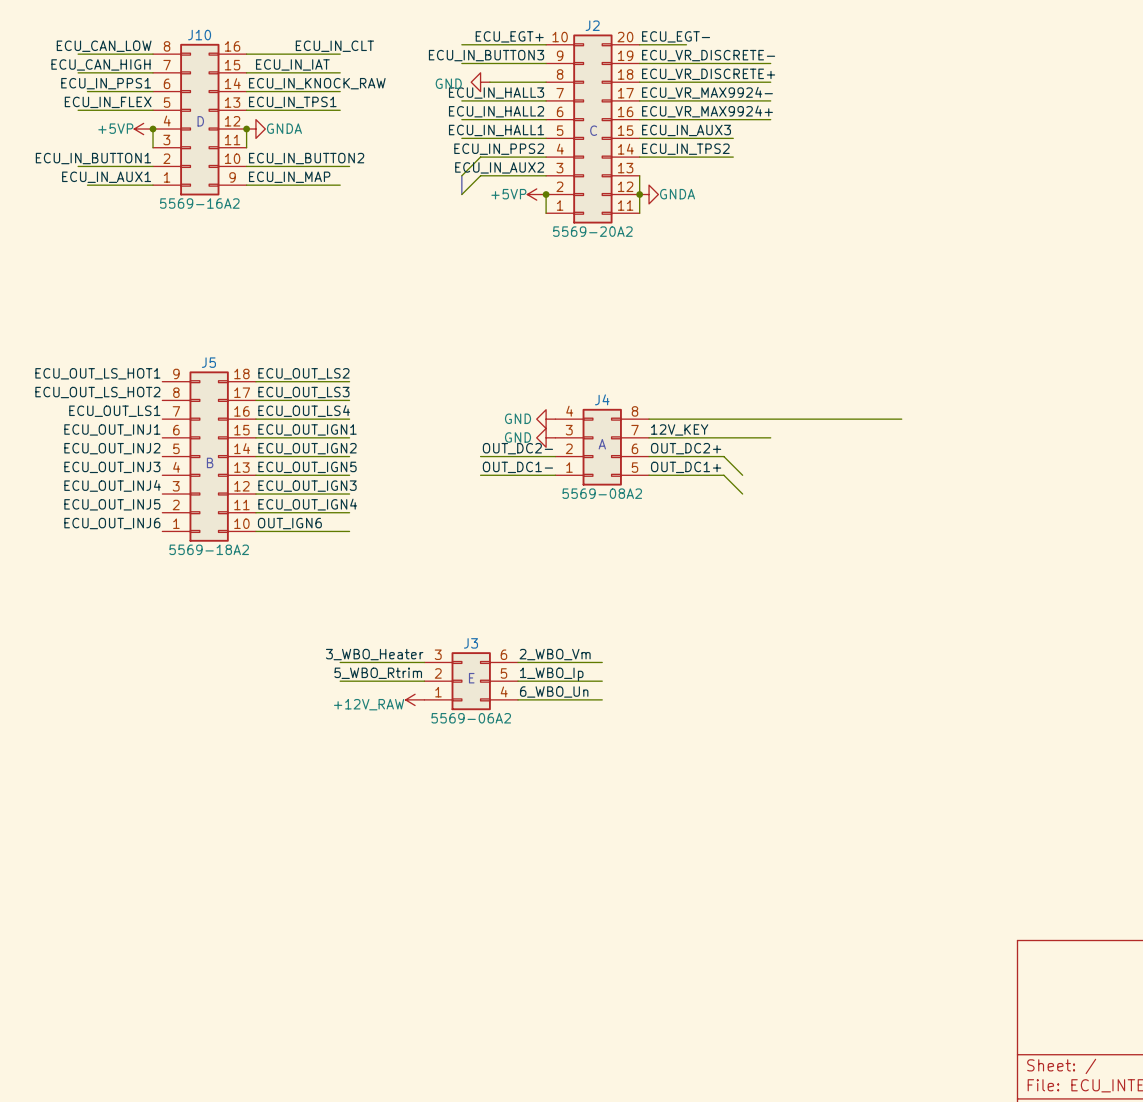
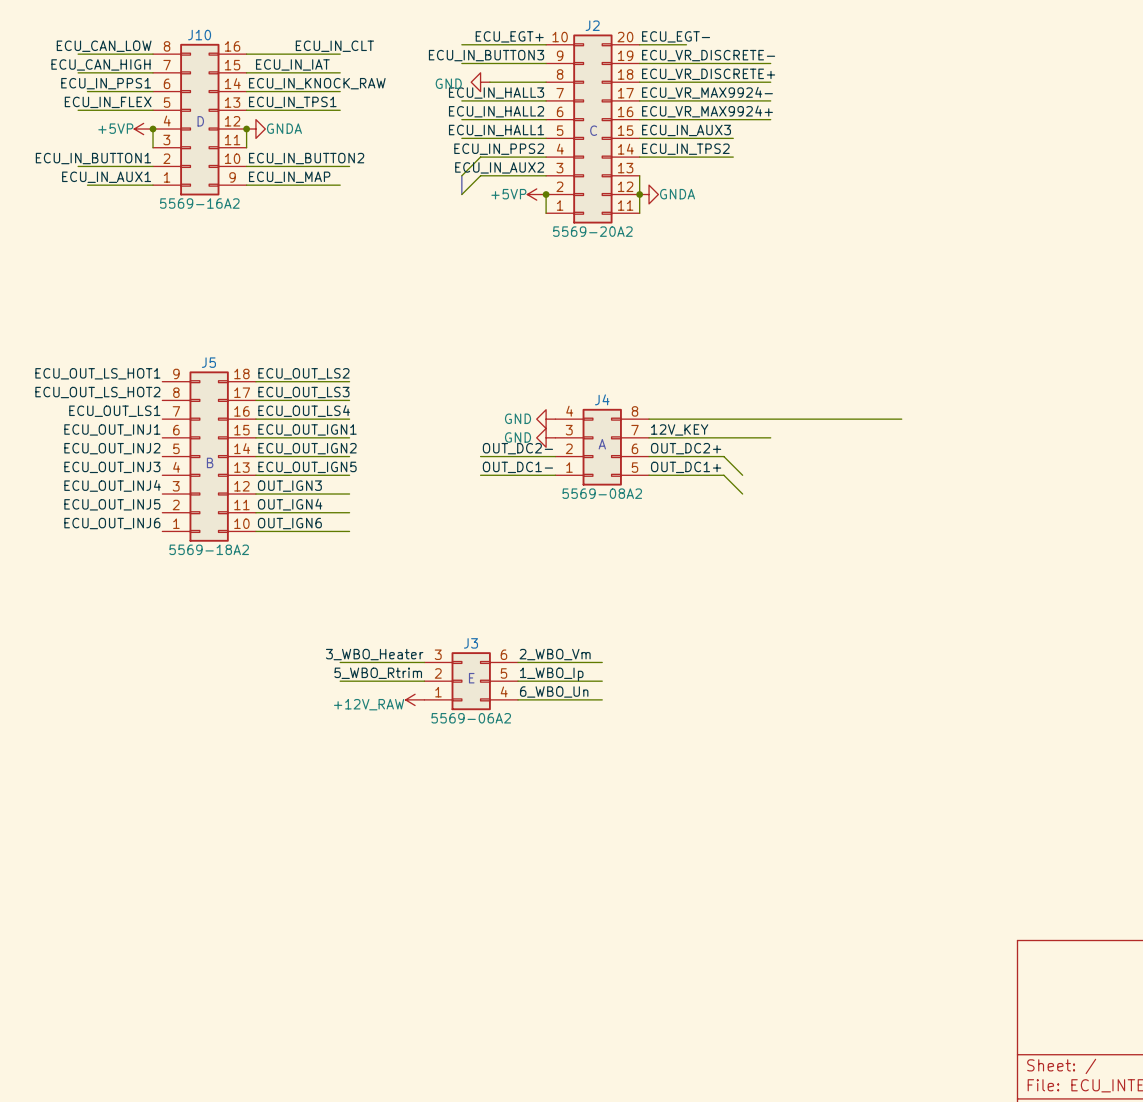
label: ECU_OUT_IGN3 (307, 486) -> OUT_IGN3 (289, 486)
label: ECU_OUT_IGN4 (307, 504) -> OUT_IGN4 (290, 504)

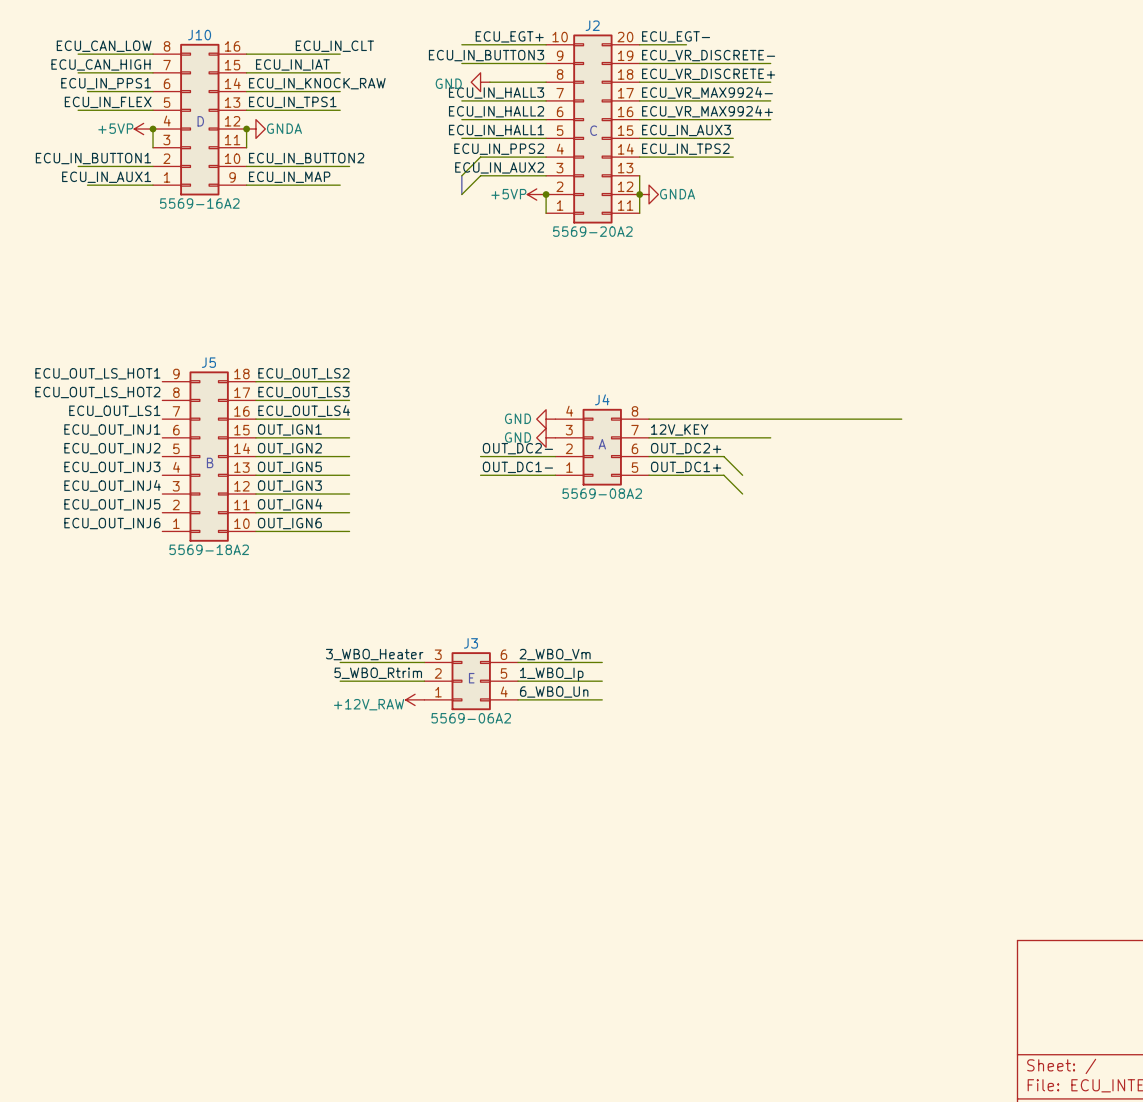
label: ECU_OUT_IGN1 (307, 429) -> OUT_IGN1 (289, 429)
label: ECU_OUT_IGN2 (307, 448) -> OUT_IGN2 (289, 448)
label: ECU_OUT_IGN5 (307, 467) -> OUT_IGN5 (289, 467)

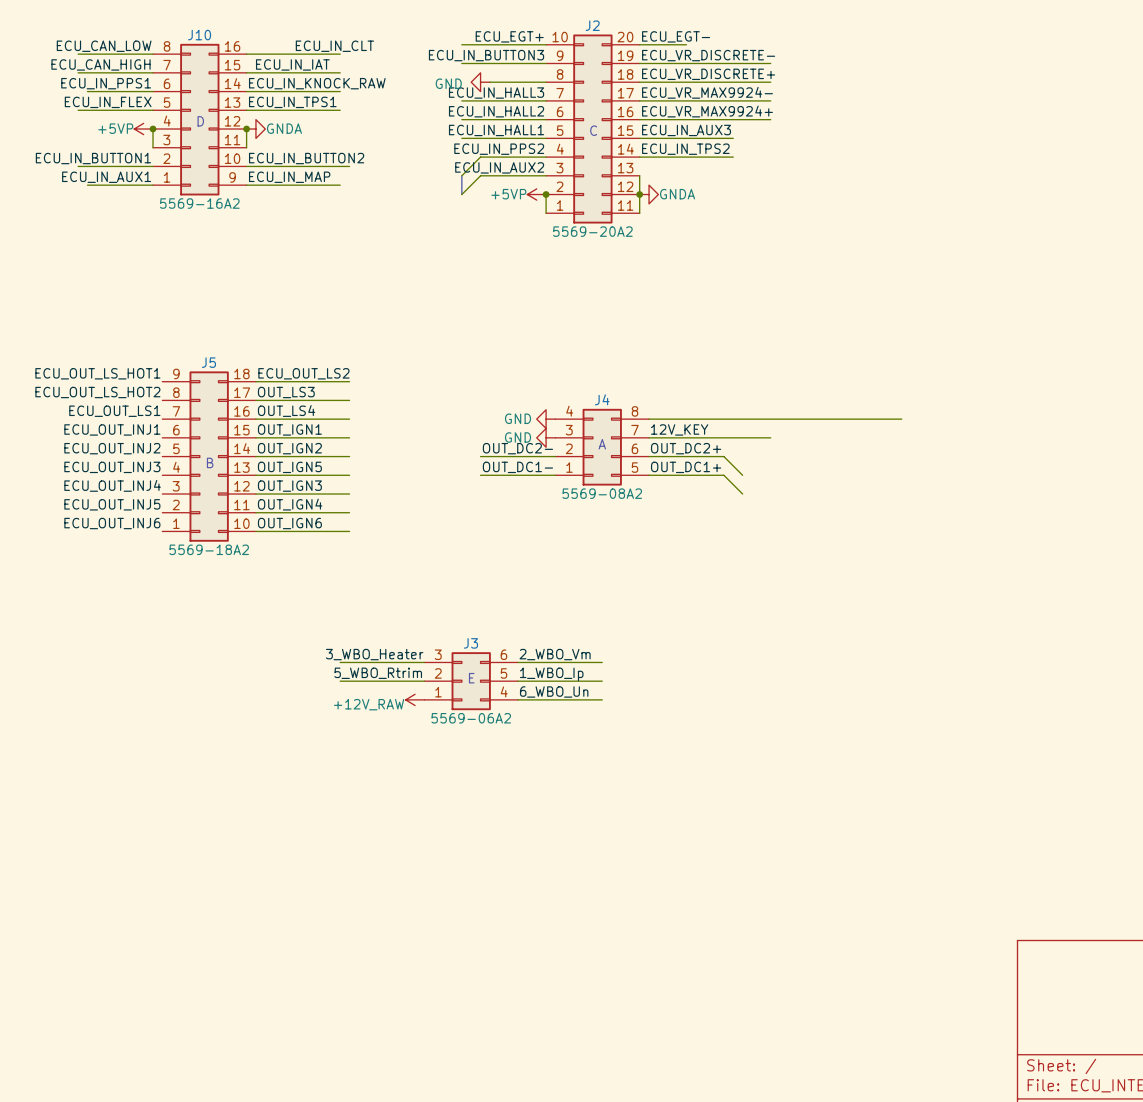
label: ECU_OUT_LS3 (303, 392) -> OUT_LS3 (286, 392)
label: ECU_OUT_LS4 (304, 411) -> OUT_LS4 (286, 411)

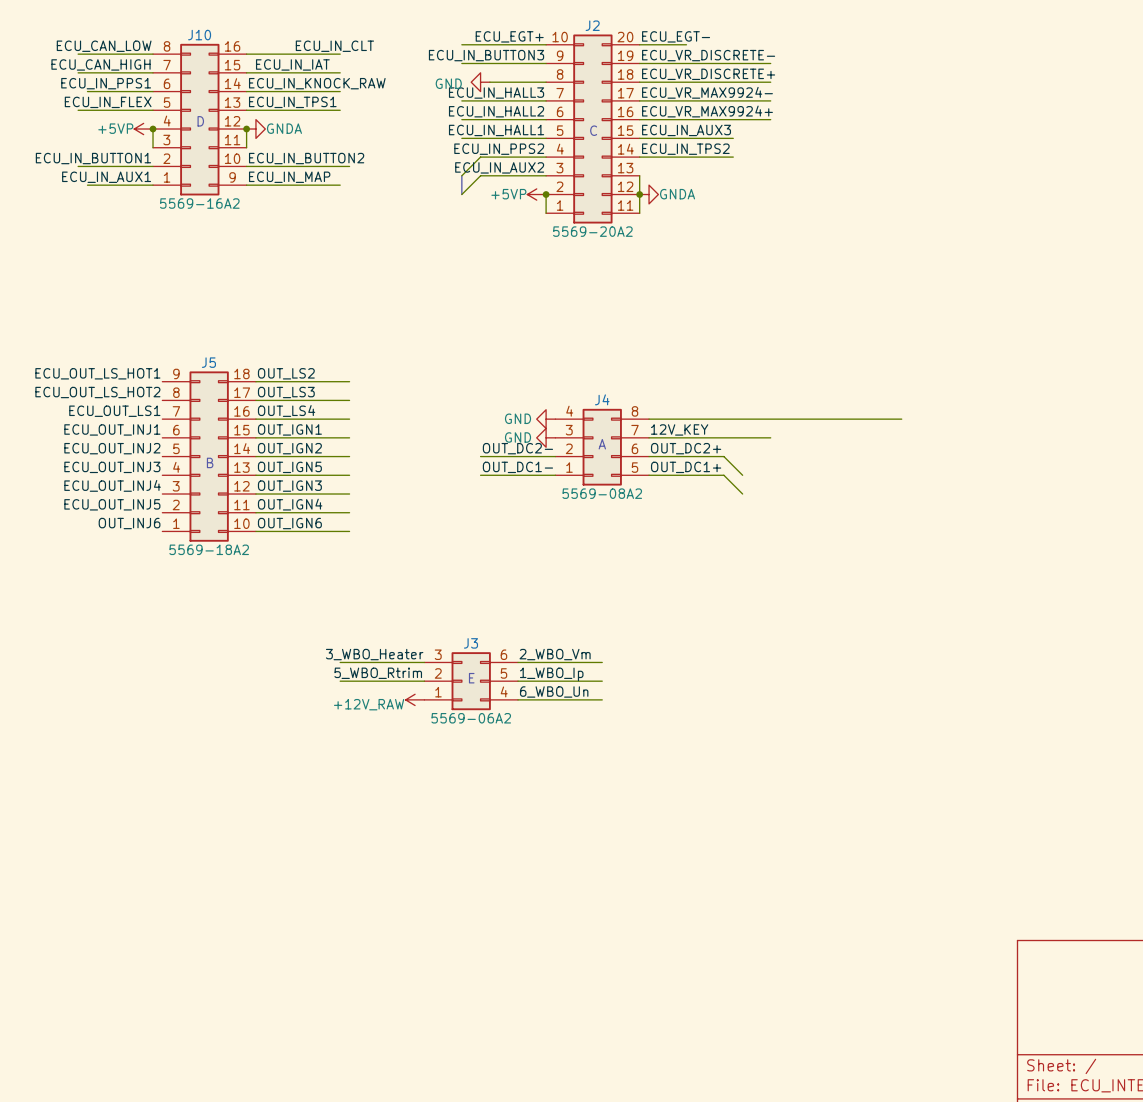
label: ECU_OUT_LS2 (303, 373) -> OUT_LS2 (286, 373)
label: ECU_OUT_INJ6 (112, 523) -> OUT_INJ6 (129, 523)

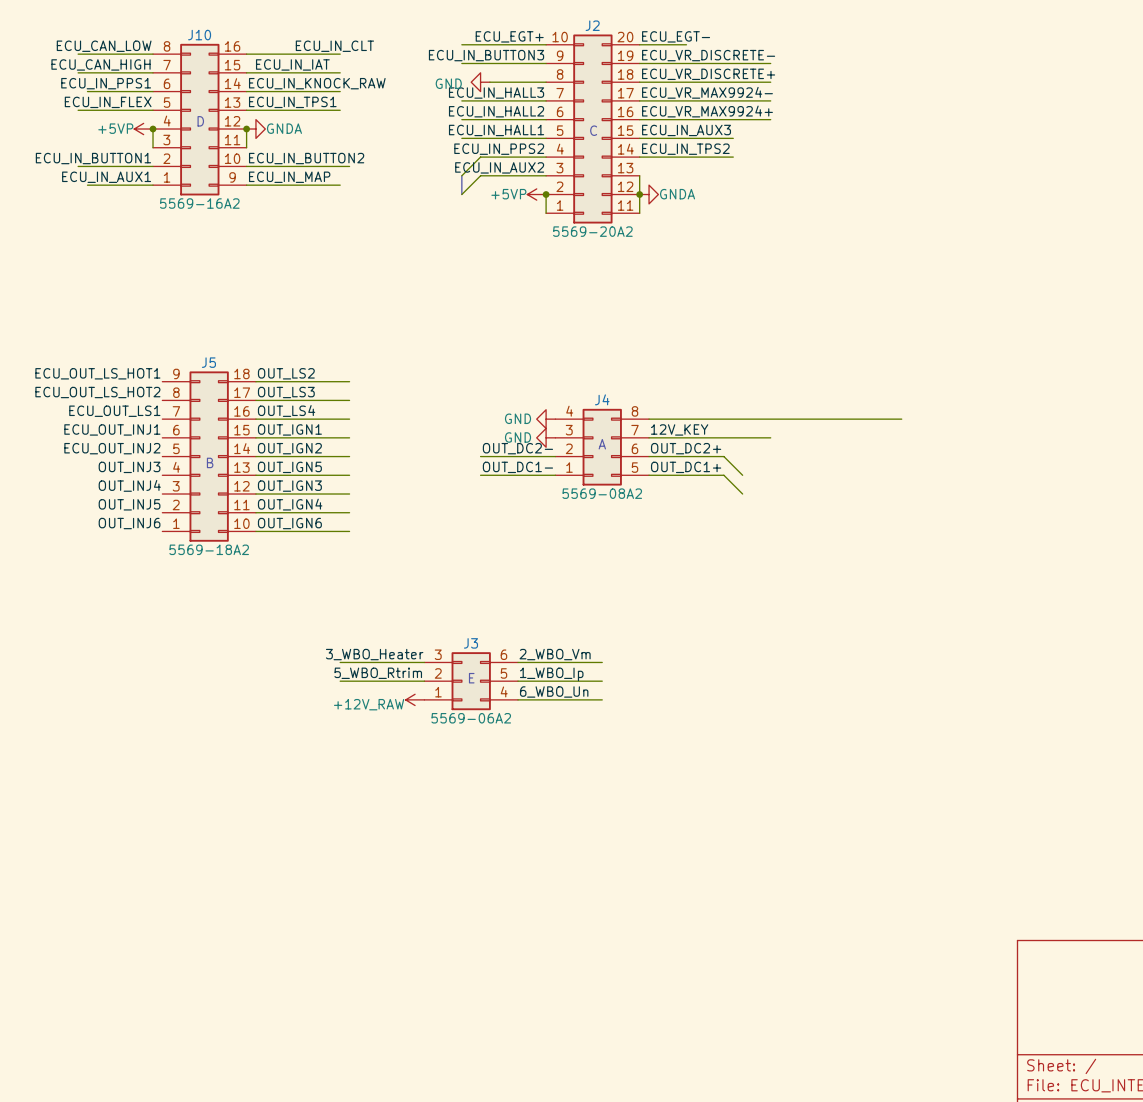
label: ECU_OUT_INJ3 (112, 467) -> OUT_INJ3 (129, 467)
label: ECU_OUT_INJ4 (112, 485) -> OUT_INJ4 (129, 485)
label: ECU_OUT_INJ5 (112, 504) -> OUT_INJ5 (129, 504)

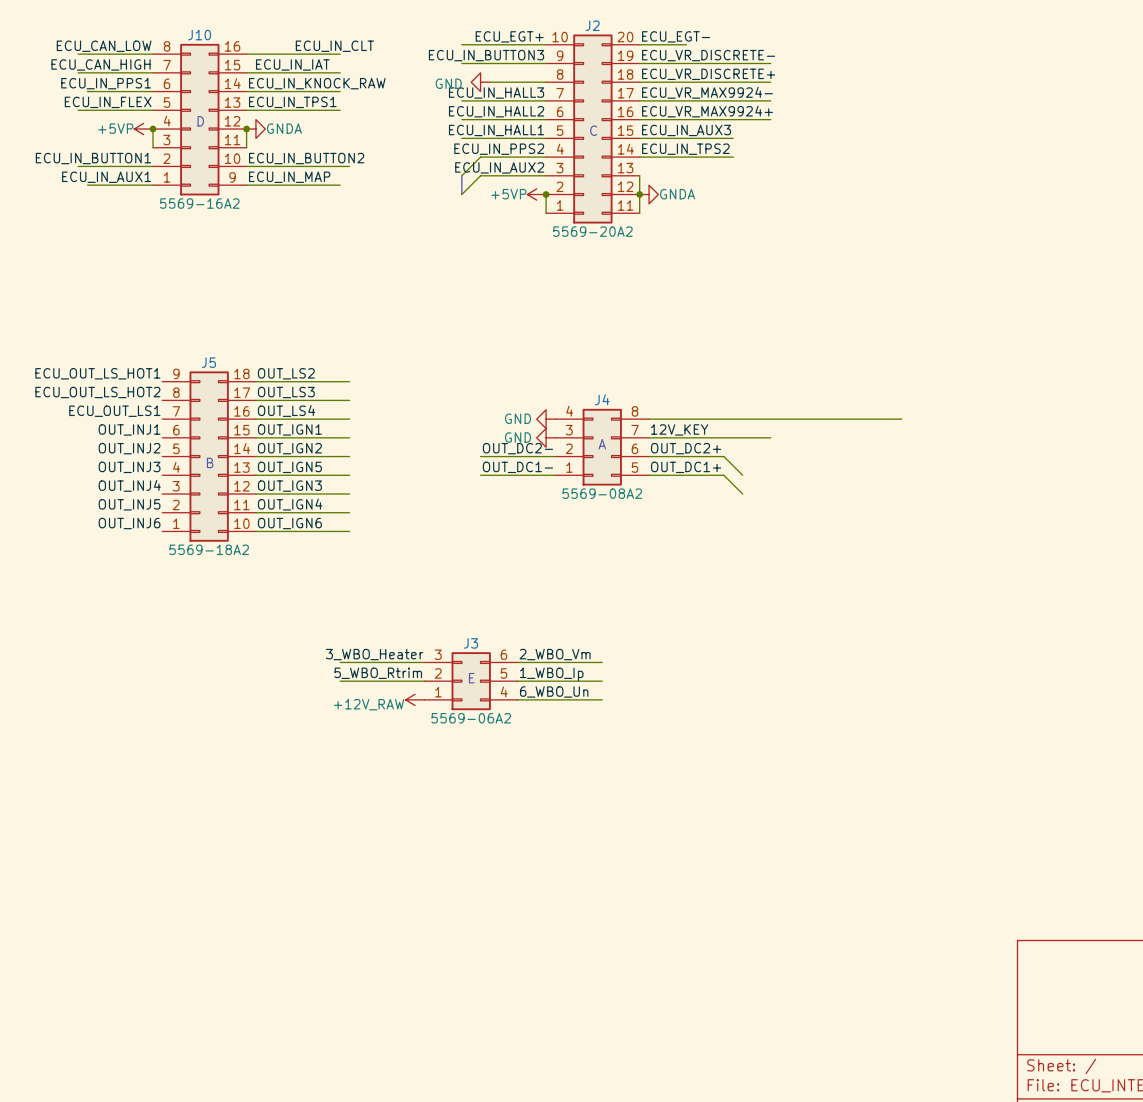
label: ECU_OUT_INJ1 (112, 429) -> OUT_INJ1 (129, 429)
label: ECU_OUT_INJ2 (112, 448) -> OUT_INJ2 (129, 448)

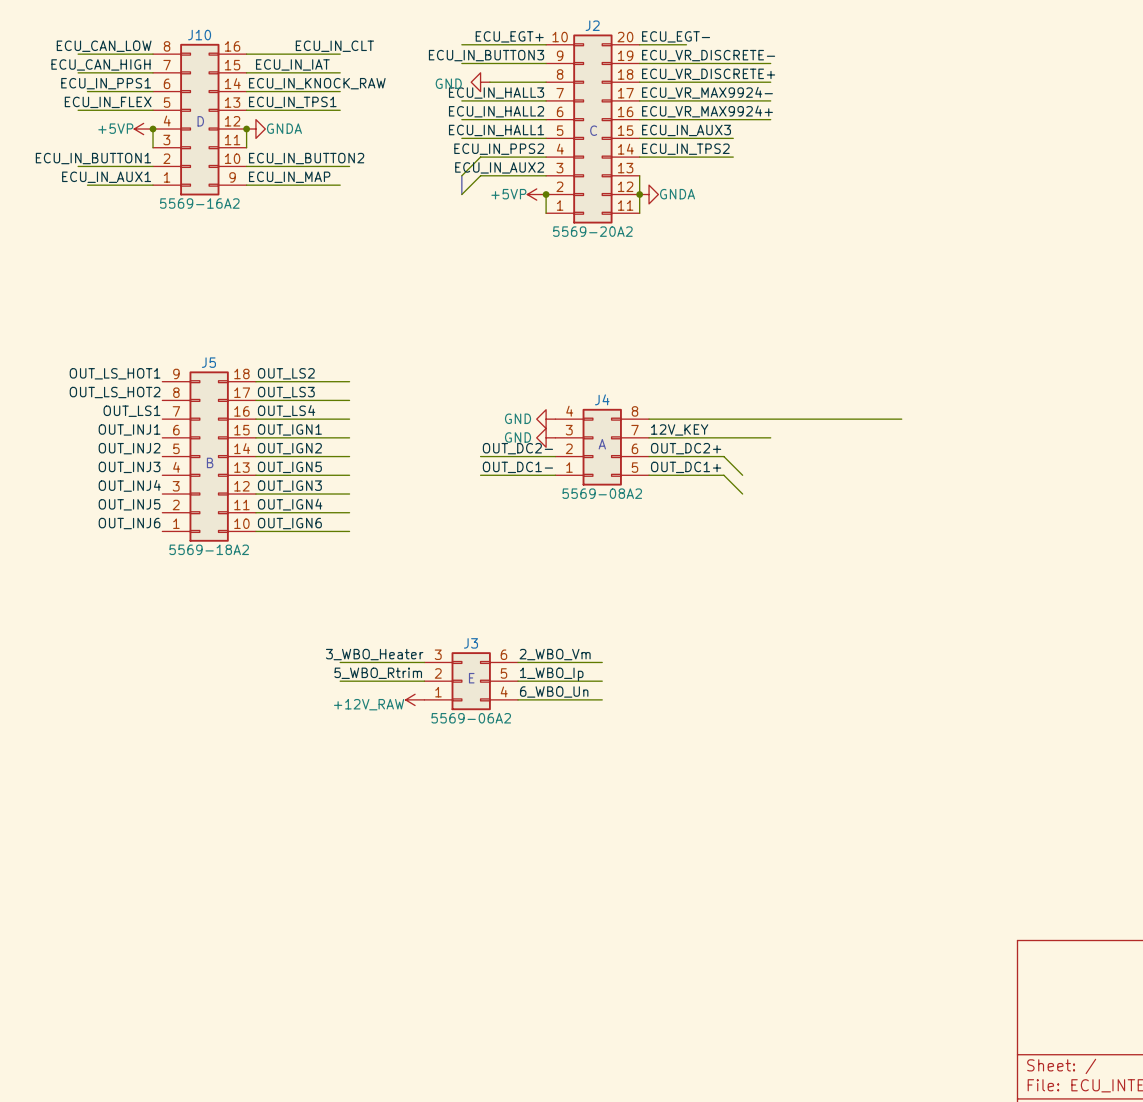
label: ECU_OUT_LS_HOT1 (97, 373) -> OUT_LS_HOT1 (115, 373)
label: ECU_OUT_LS_HOT2 (97, 392) -> OUT_LS_HOT2 (115, 392)
label: ECU_OUT_LS1 (114, 411) -> OUT_LS1 (131, 411)

